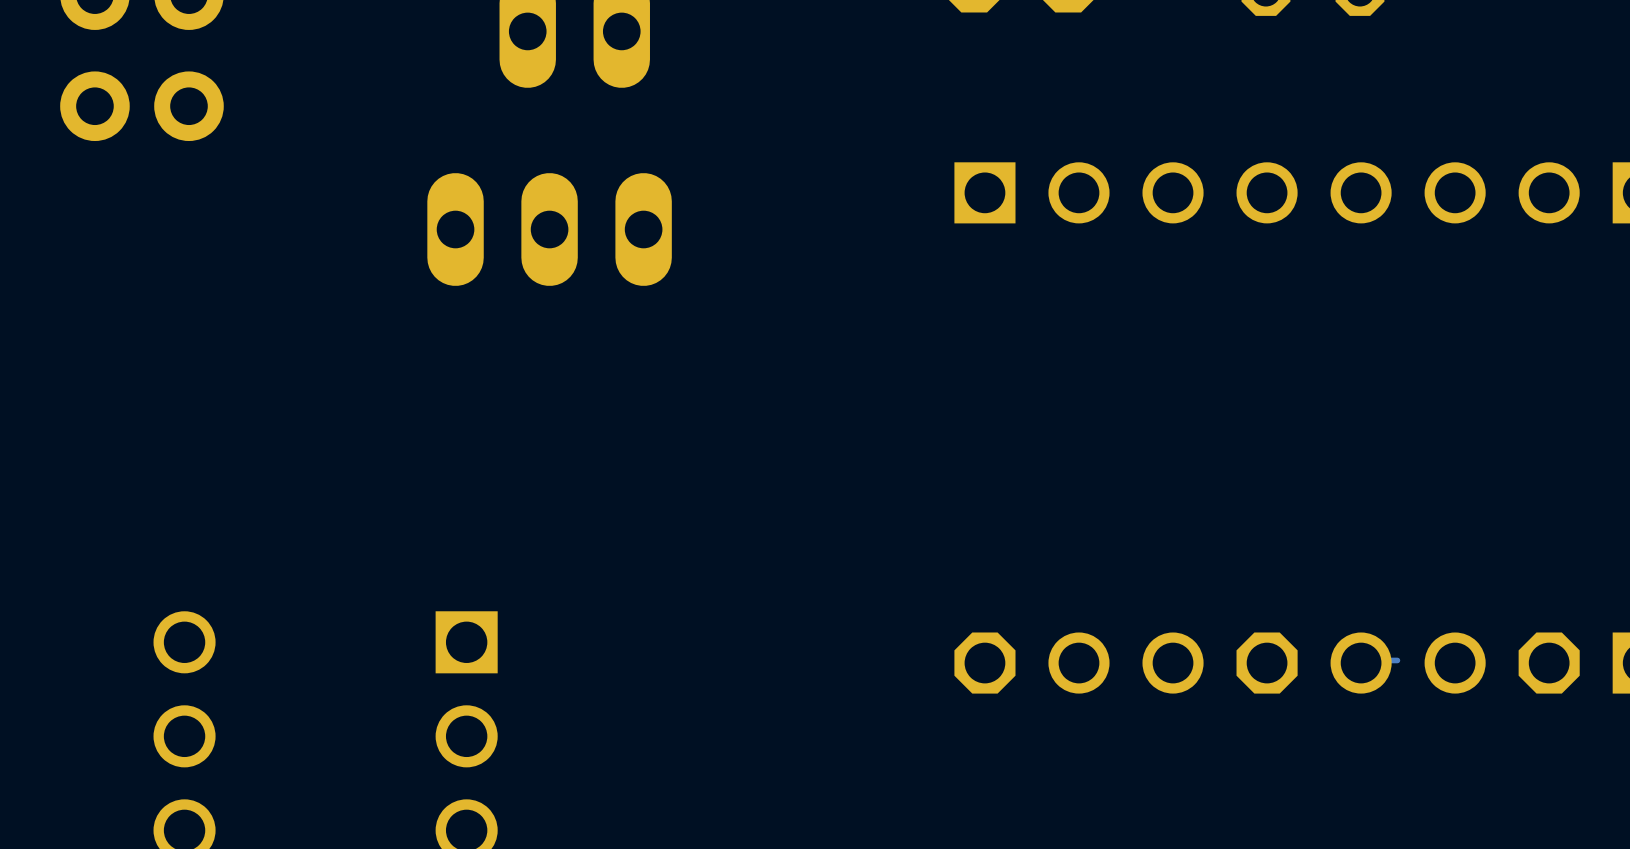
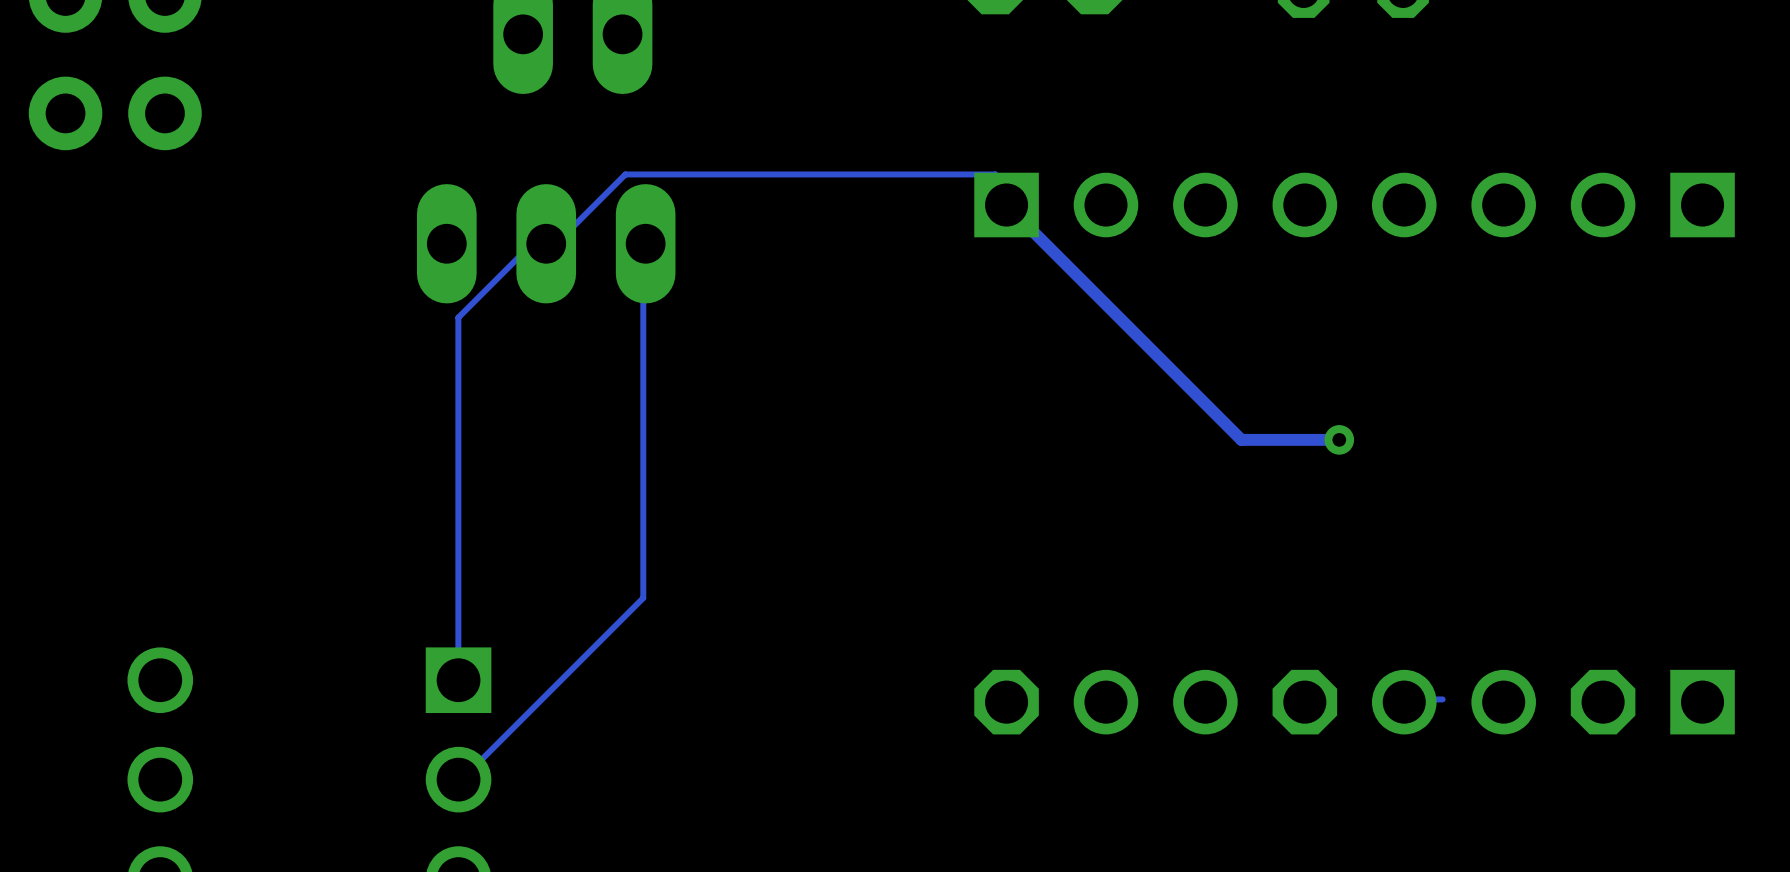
bottom track: none -> (645, 243) (643, 246) (643, 598) (464, 776) (458, 779)
bottom track: none -> (1339, 439) (1241, 439) (1006, 205) (995, 174) (625, 174) (559, 240) (547, 240) (541, 246) (529, 246) (458, 317) (458, 680)
via: none -> (1339, 439)

